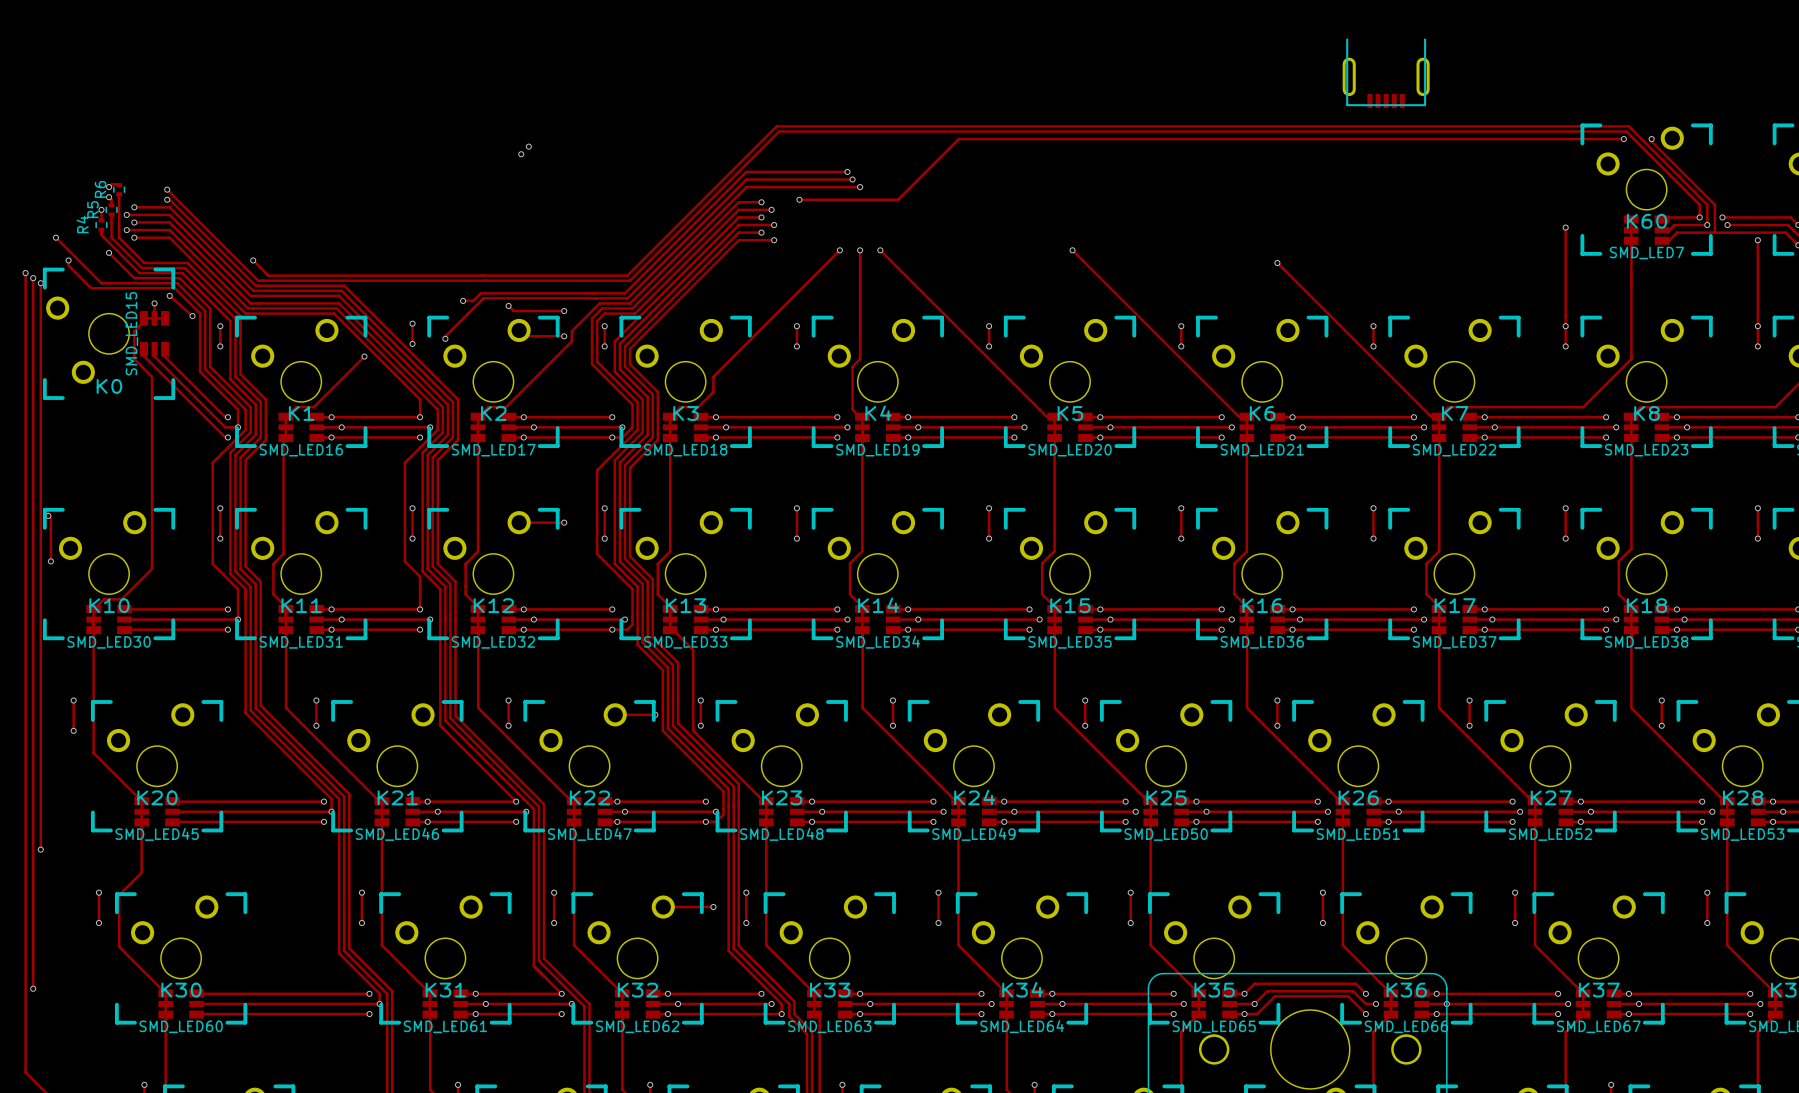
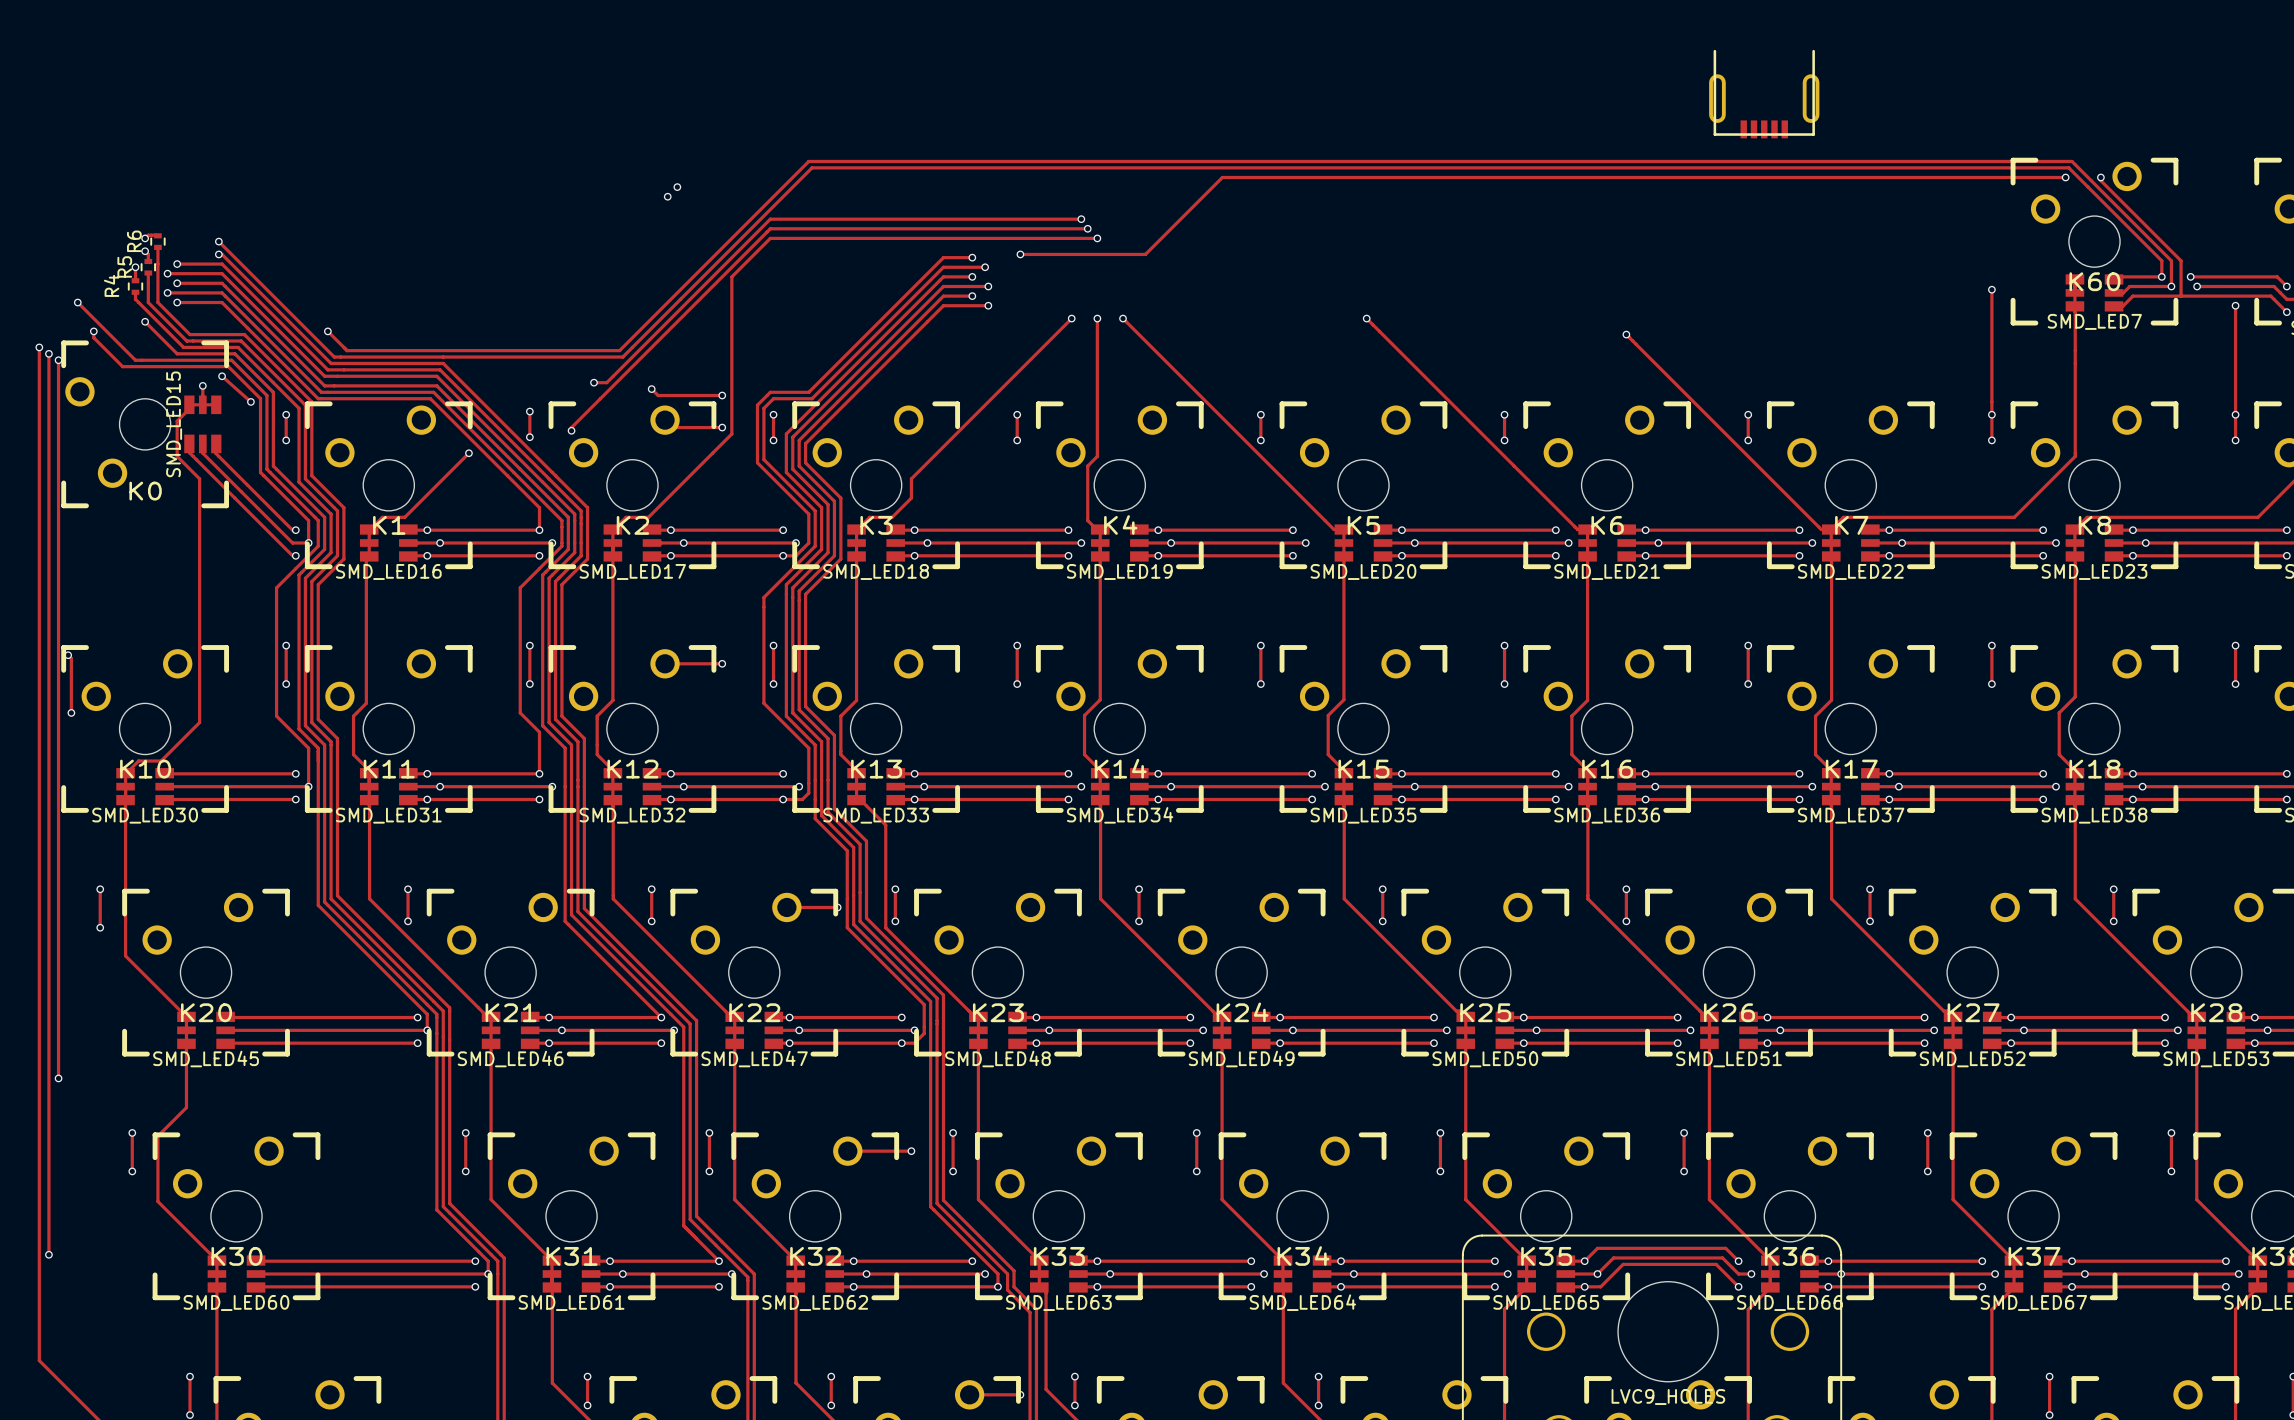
track: (776, 126) (627, 275) (483, 275) -> (991, 161) (808, 161) (619, 350)
track: (779, 131) (630, 280) (485, 280) -> (994, 167) (812, 167) (622, 357)
track: (746, 171) (624, 293) (480, 293) -> (953, 219) (770, 219) (616, 373)
track: (746, 179) (627, 298) (483, 298) -> (953, 228) (770, 228) (619, 379)
track: (746, 187) (630, 303) (599, 303) (571, 331) -> (953, 238) (770, 238) (731, 276) (731, 421)

